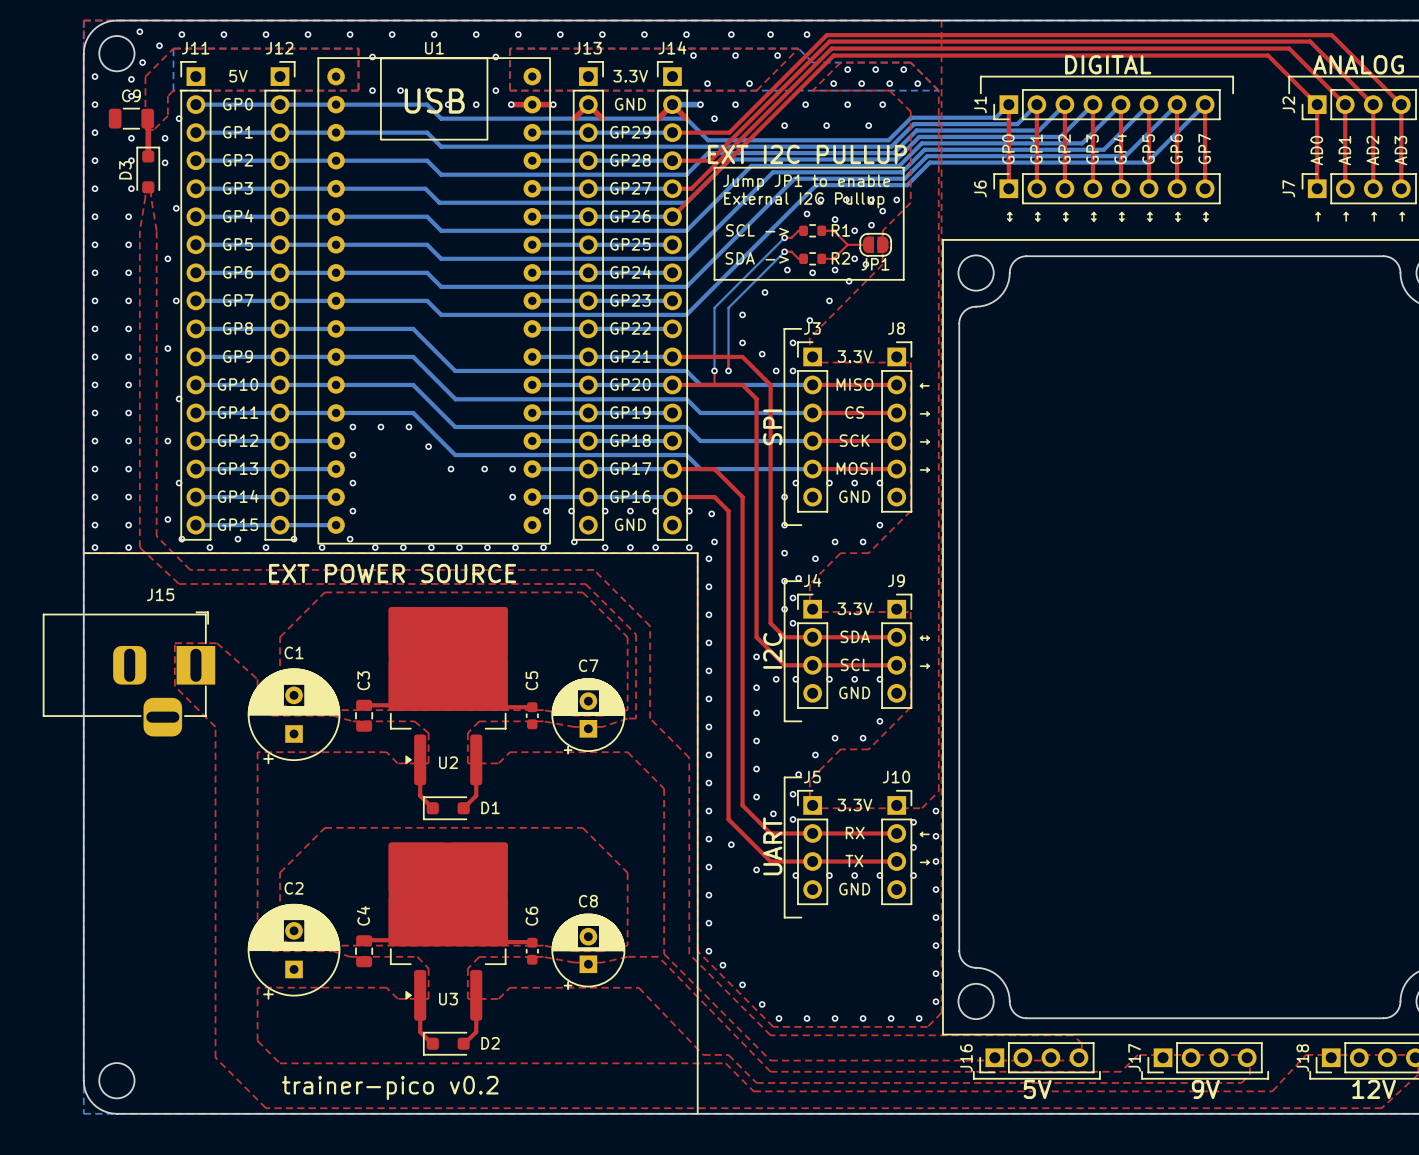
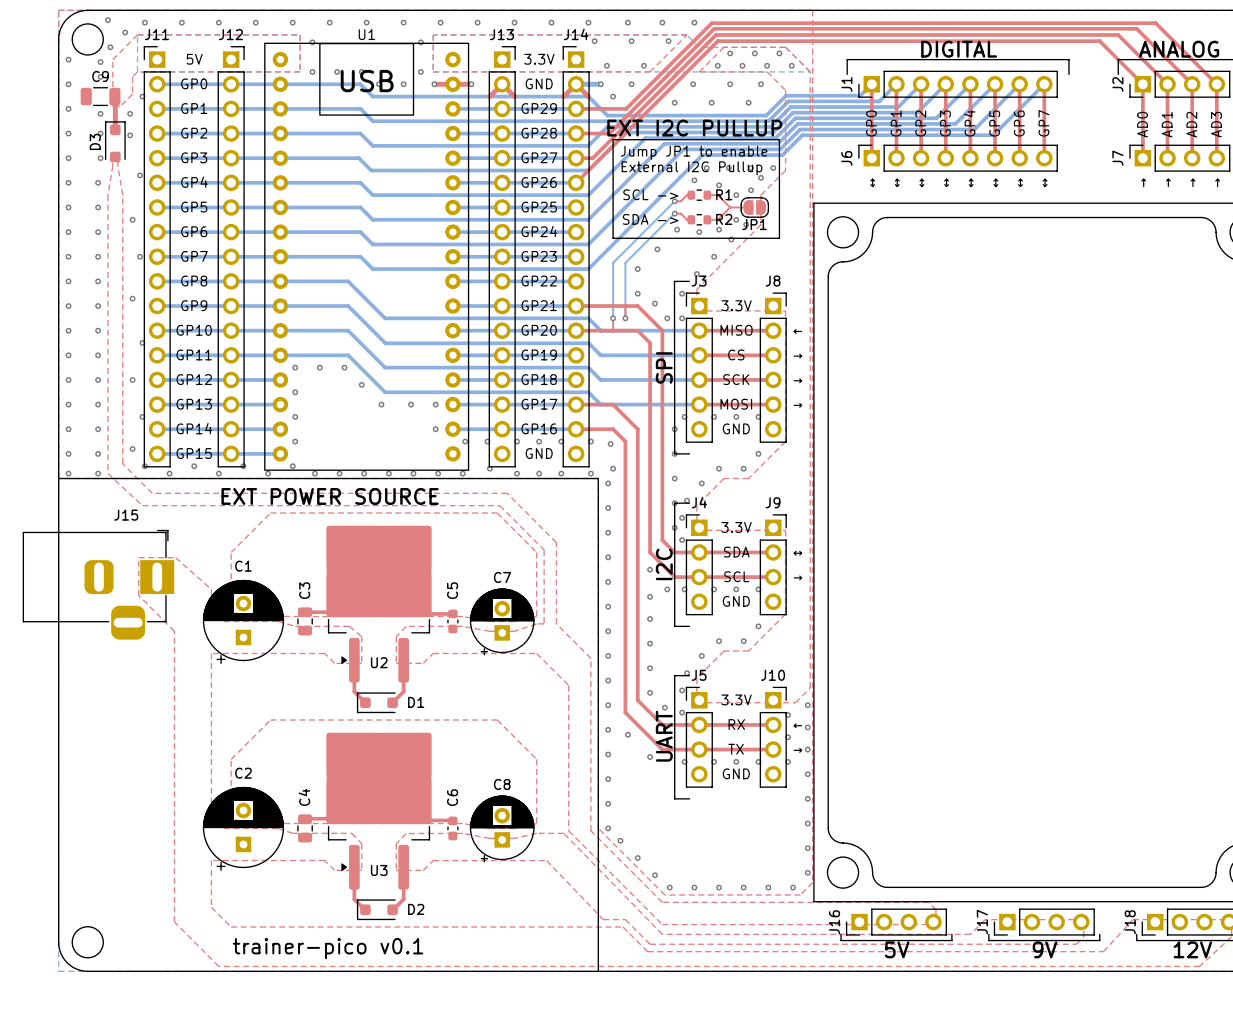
text: trainer-pico v0.2 (390, 1087) -> trainer-pico v0.1 (328, 948)

